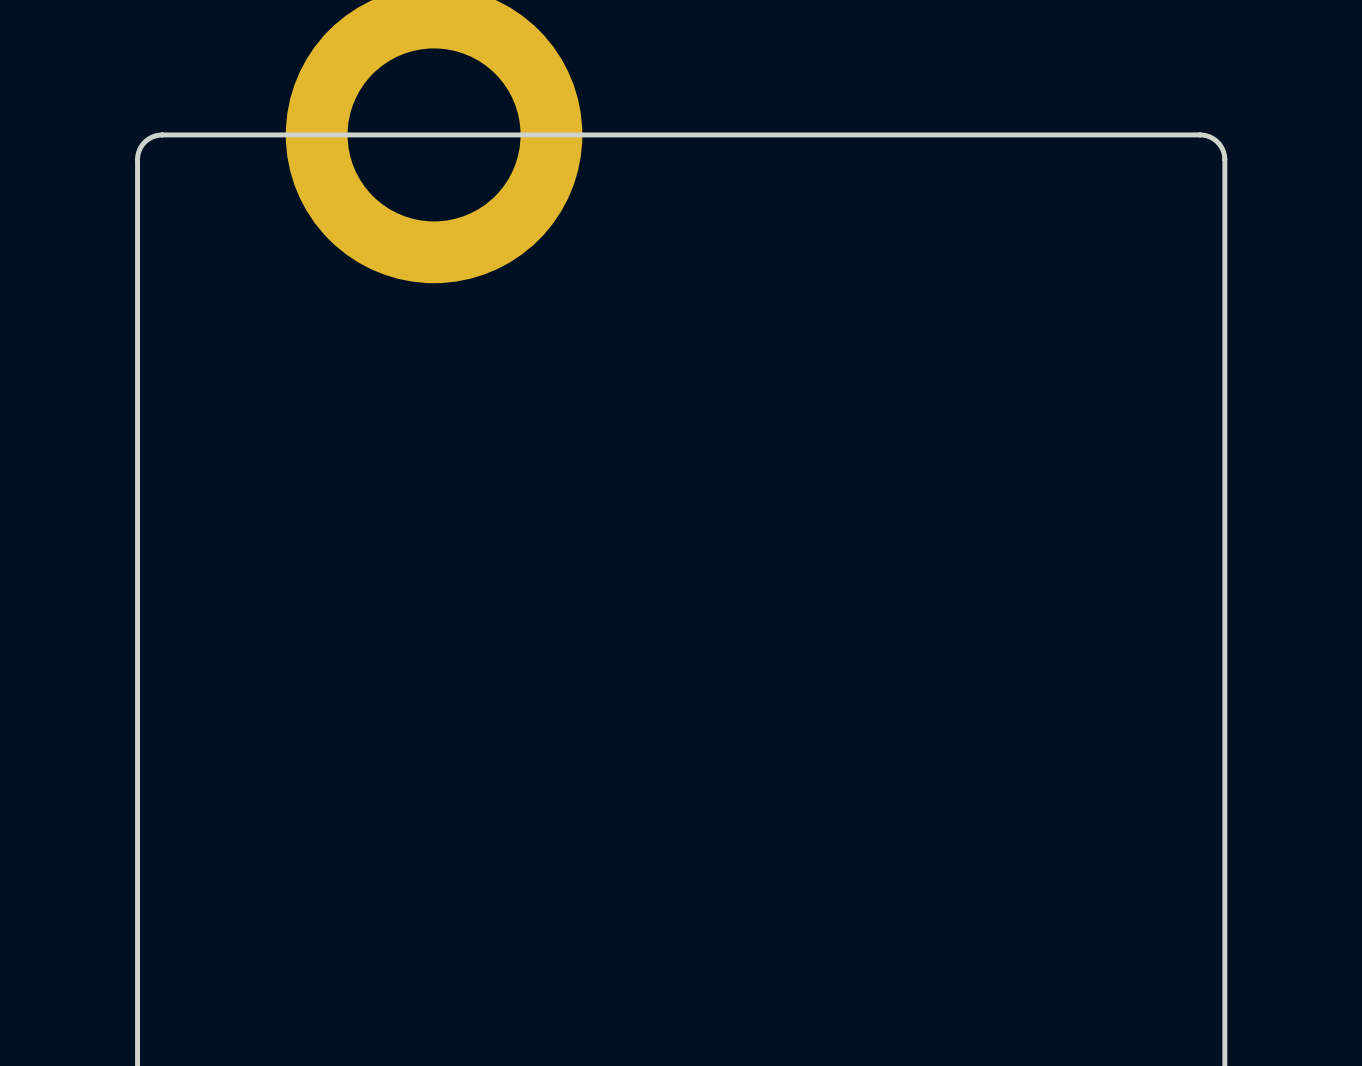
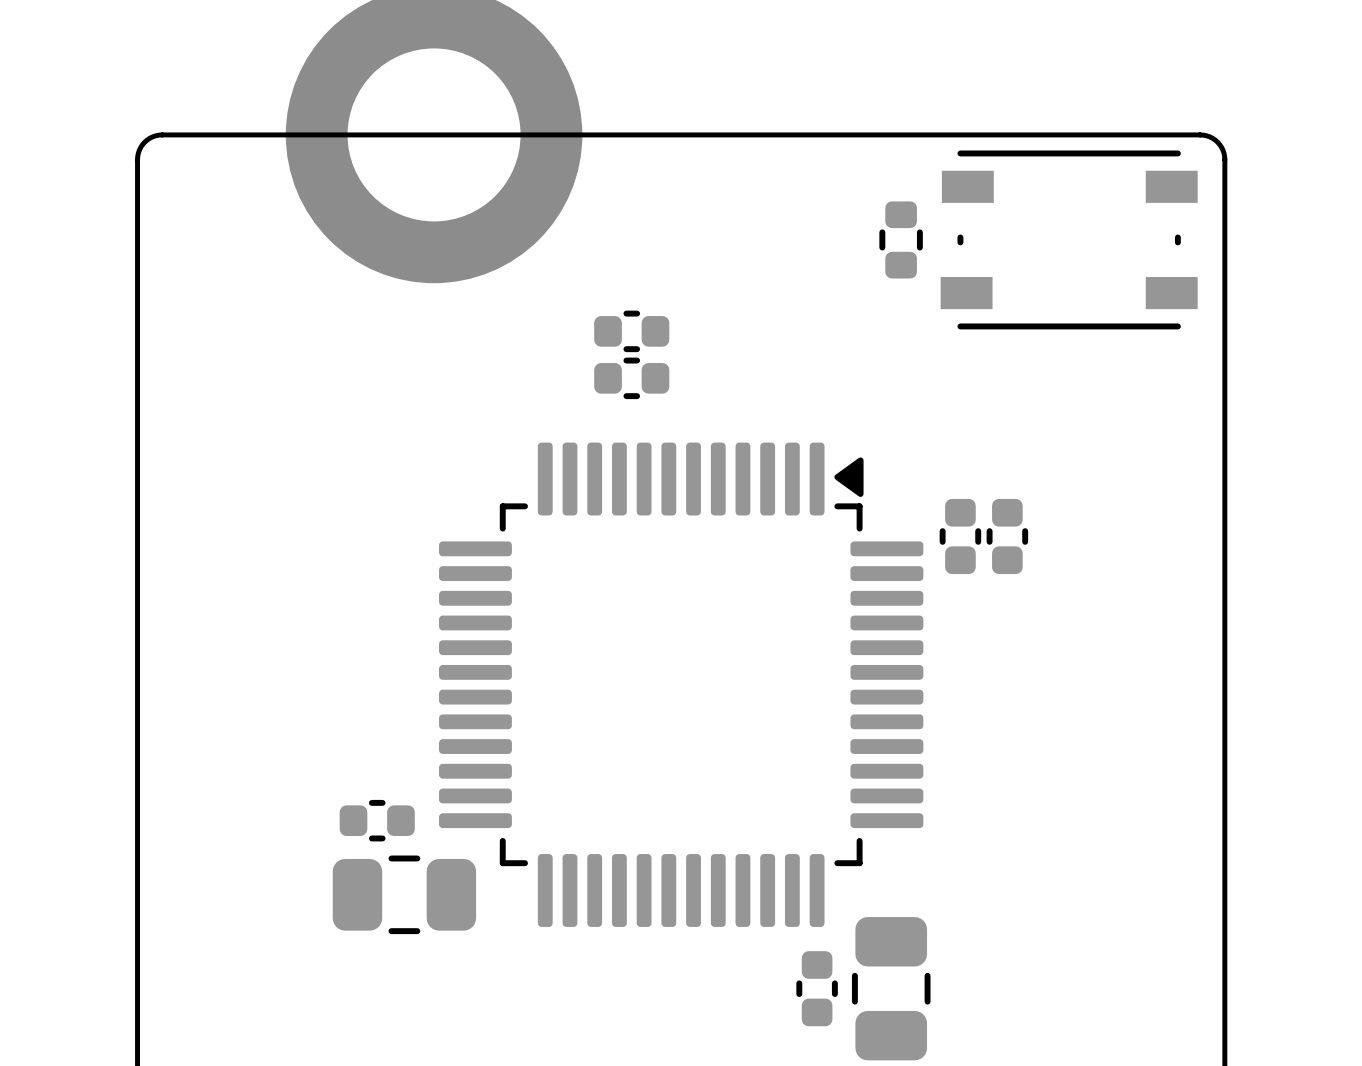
part: none -> (901, 239)
part: none -> (1069, 239)
part: none -> (631, 331)
part: none -> (631, 378)
part: none -> (960, 536)
part: none -> (1007, 536)
part: none -> (681, 684)
part: none -> (377, 820)
part: none -> (404, 894)
part: none -> (817, 988)
part: none -> (891, 988)

